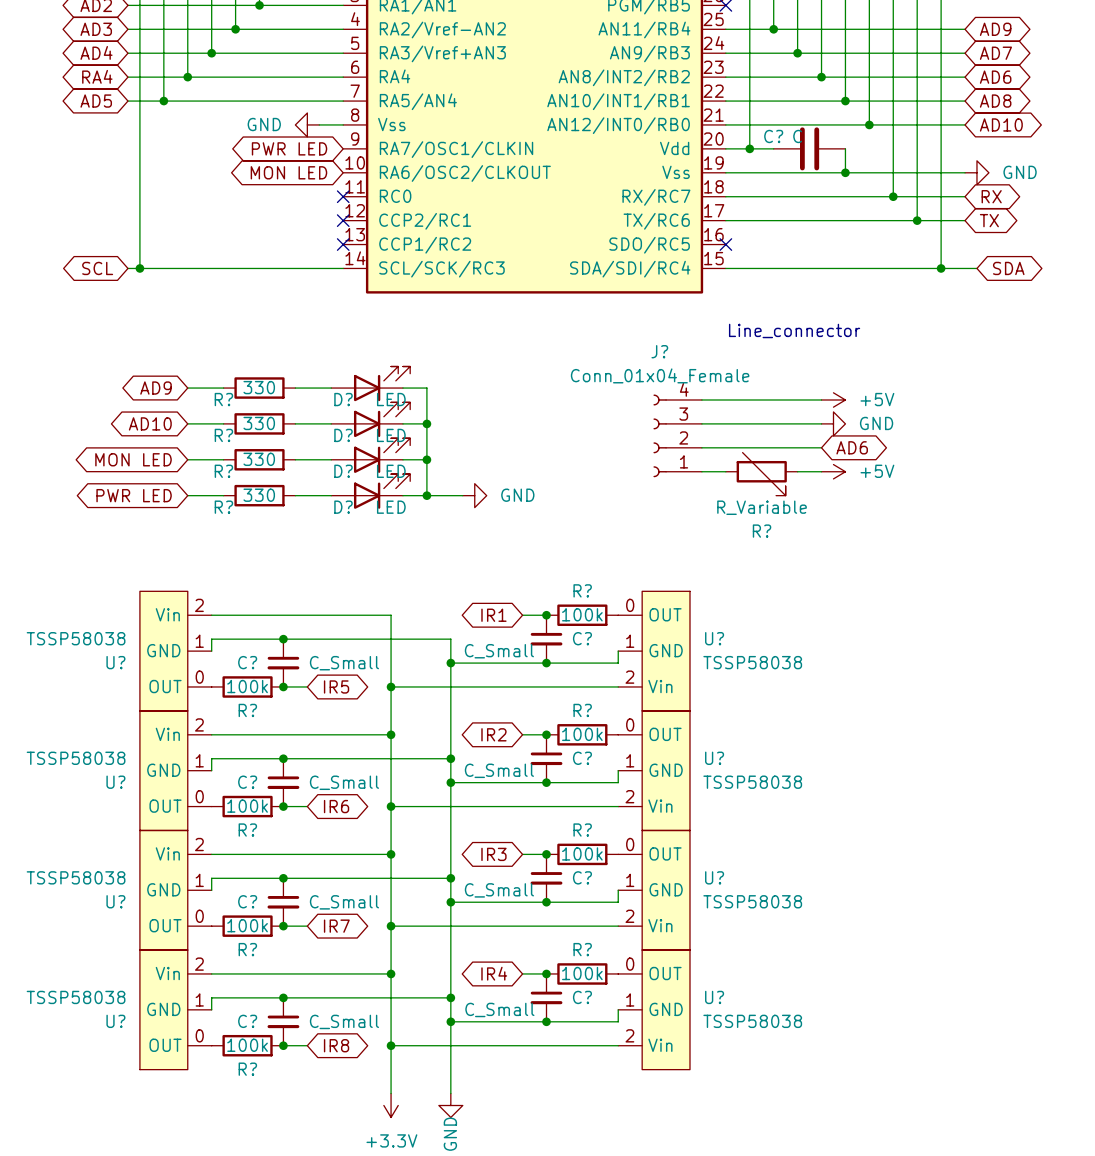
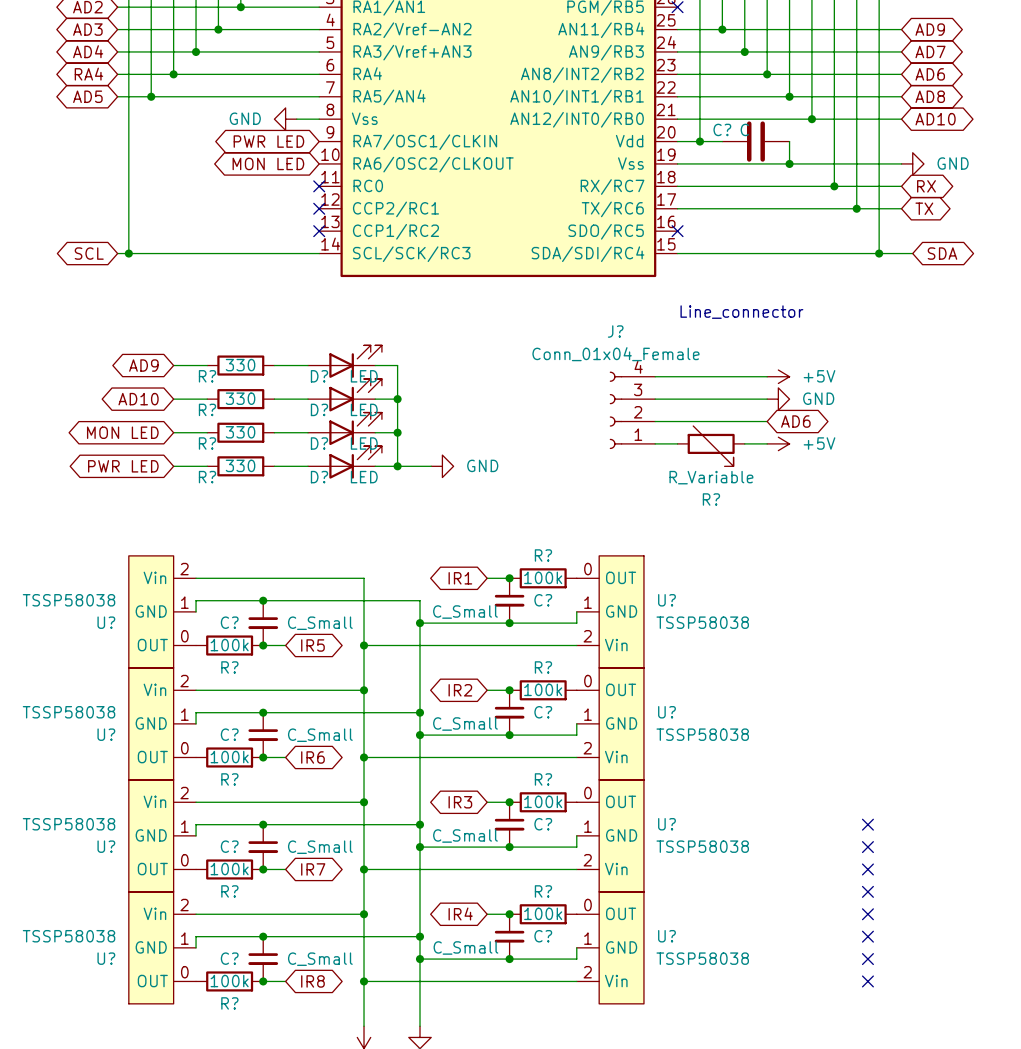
no-connect mark: none -> (867, 824)
no-connect mark: none -> (867, 847)
no-connect mark: none -> (867, 869)
no-connect mark: none -> (867, 891)
no-connect mark: none -> (867, 914)
no-connect mark: none -> (867, 936)
no-connect mark: none -> (867, 959)
no-connect mark: none -> (867, 981)

